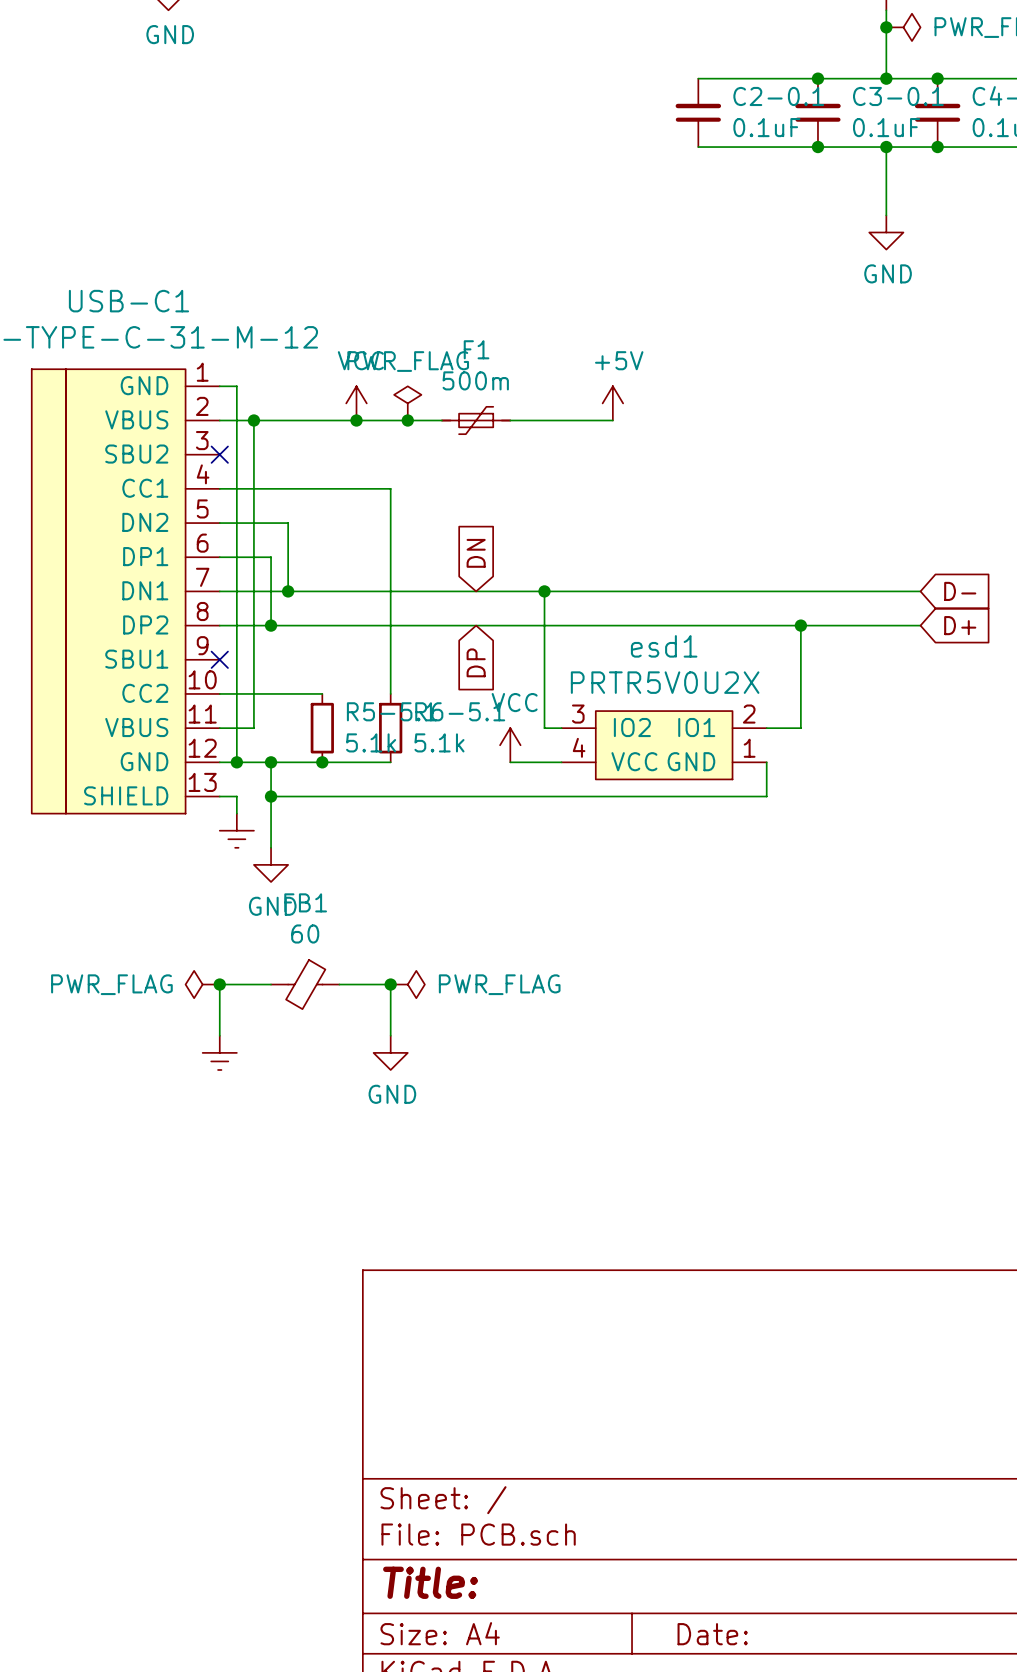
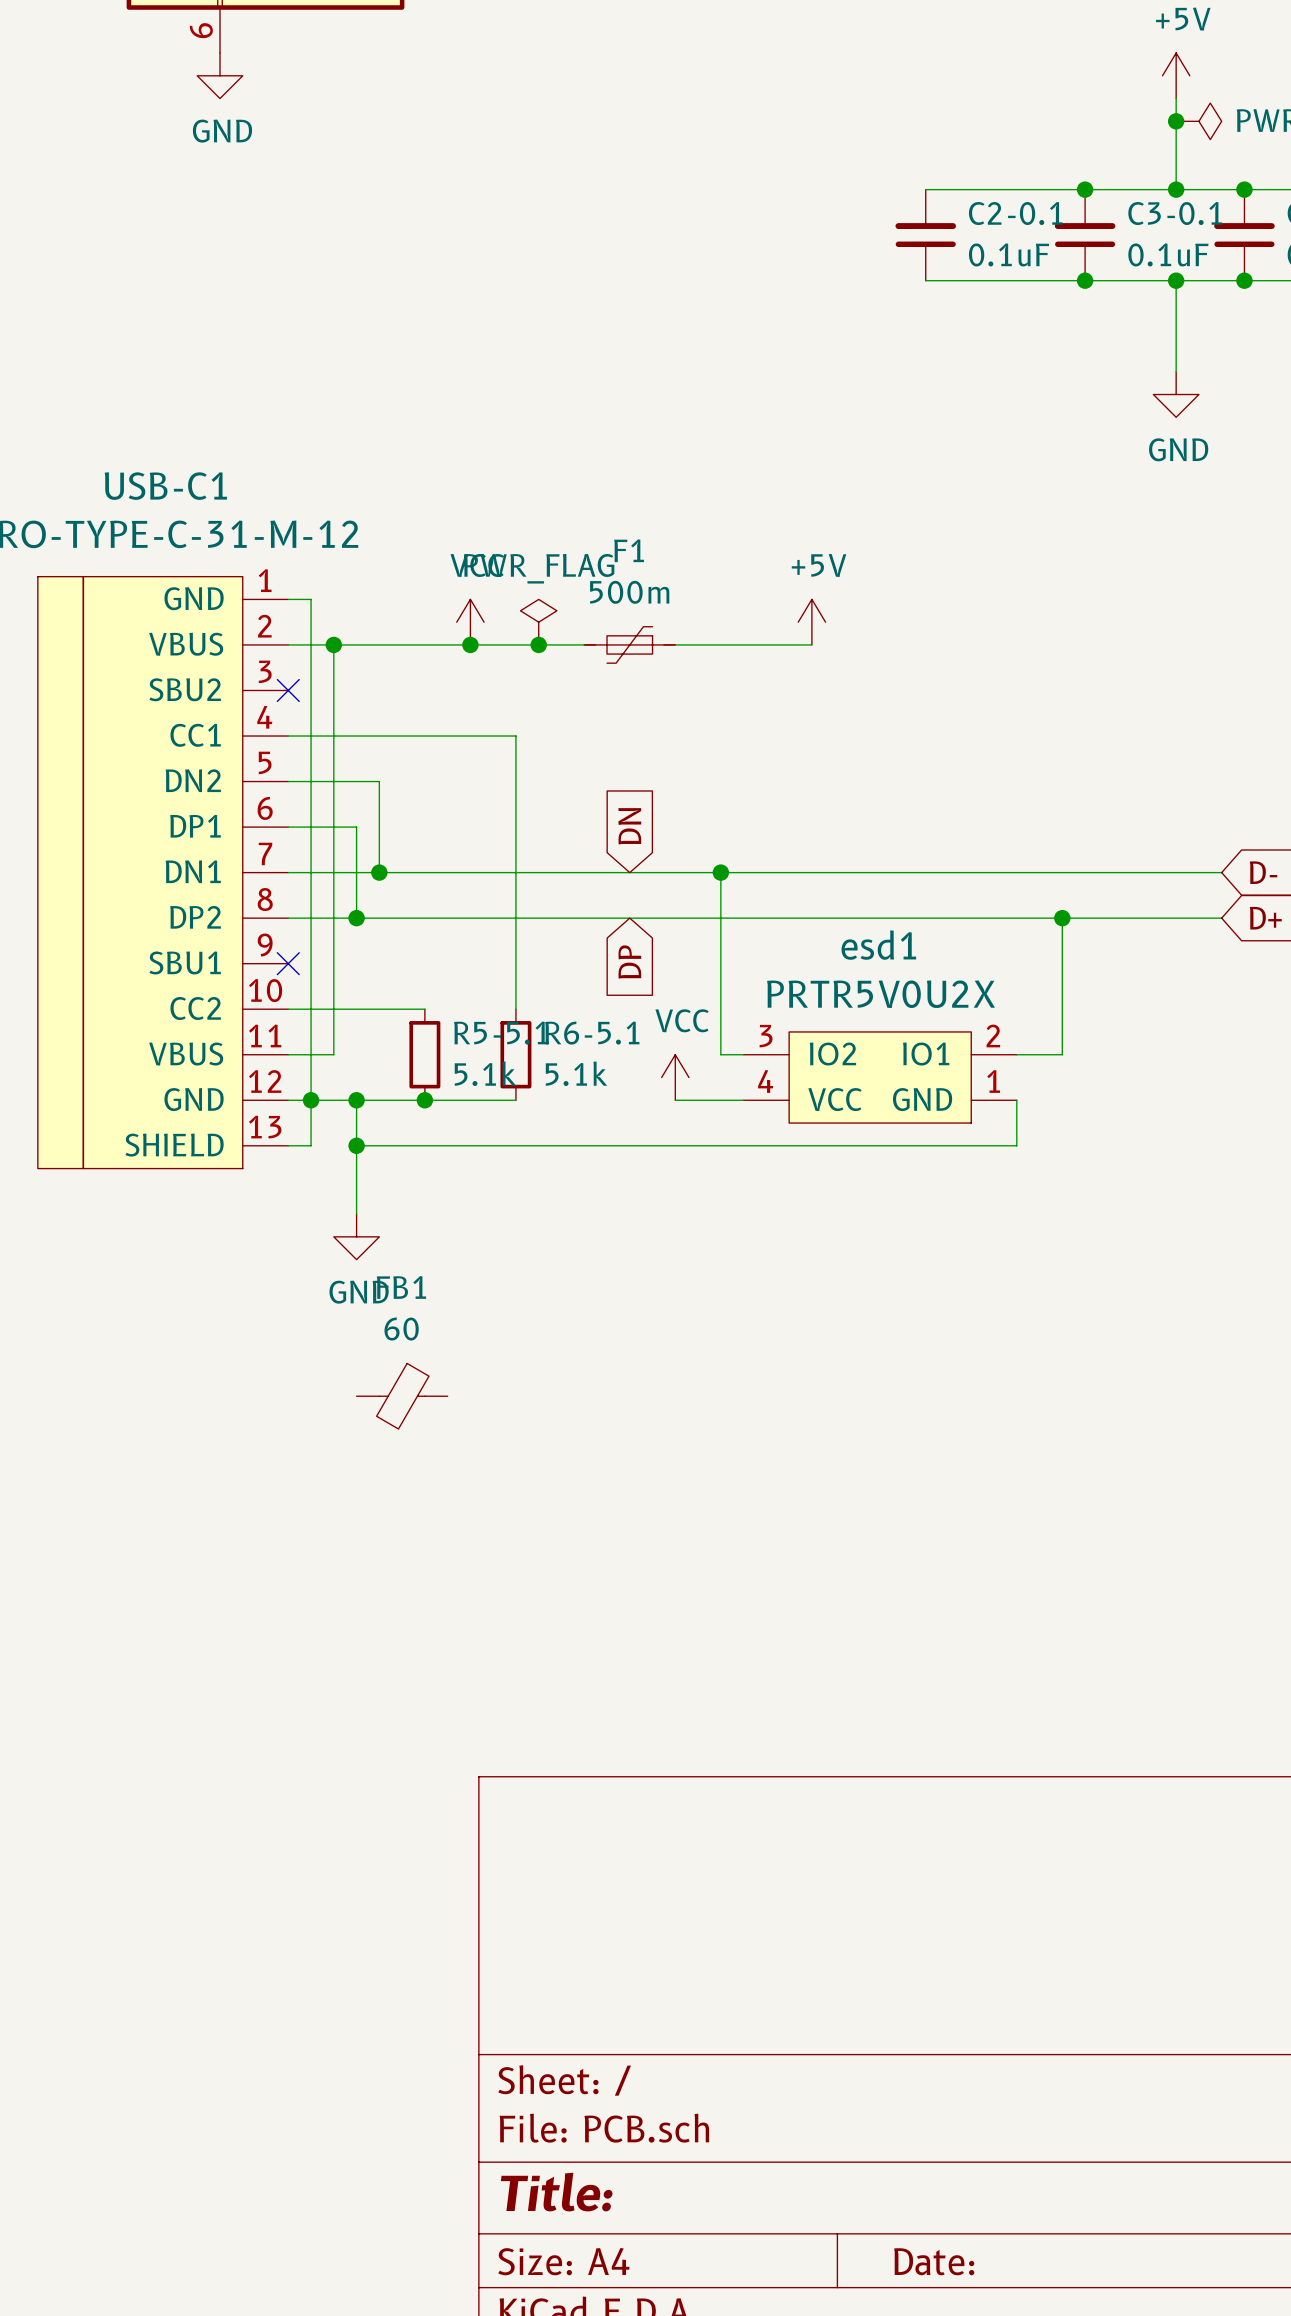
wire: (236, 796) (236, 813) -> (311, 1145) (311, 1100)
power symbol: (236, 830) -> none
power symbol: PWR_FLAG (202, 984) -> none
junction: (219, 984) -> none
wire: (271, 984) (219, 984) (219, 1035) -> none
wire: (339, 984) (390, 984) (390, 1035) -> none
junction: (390, 984) -> none
power symbol: PWR_FLAG (407, 984) -> none
power symbol: (219, 1052) -> none
power symbol: GND (390, 1052) -> none

